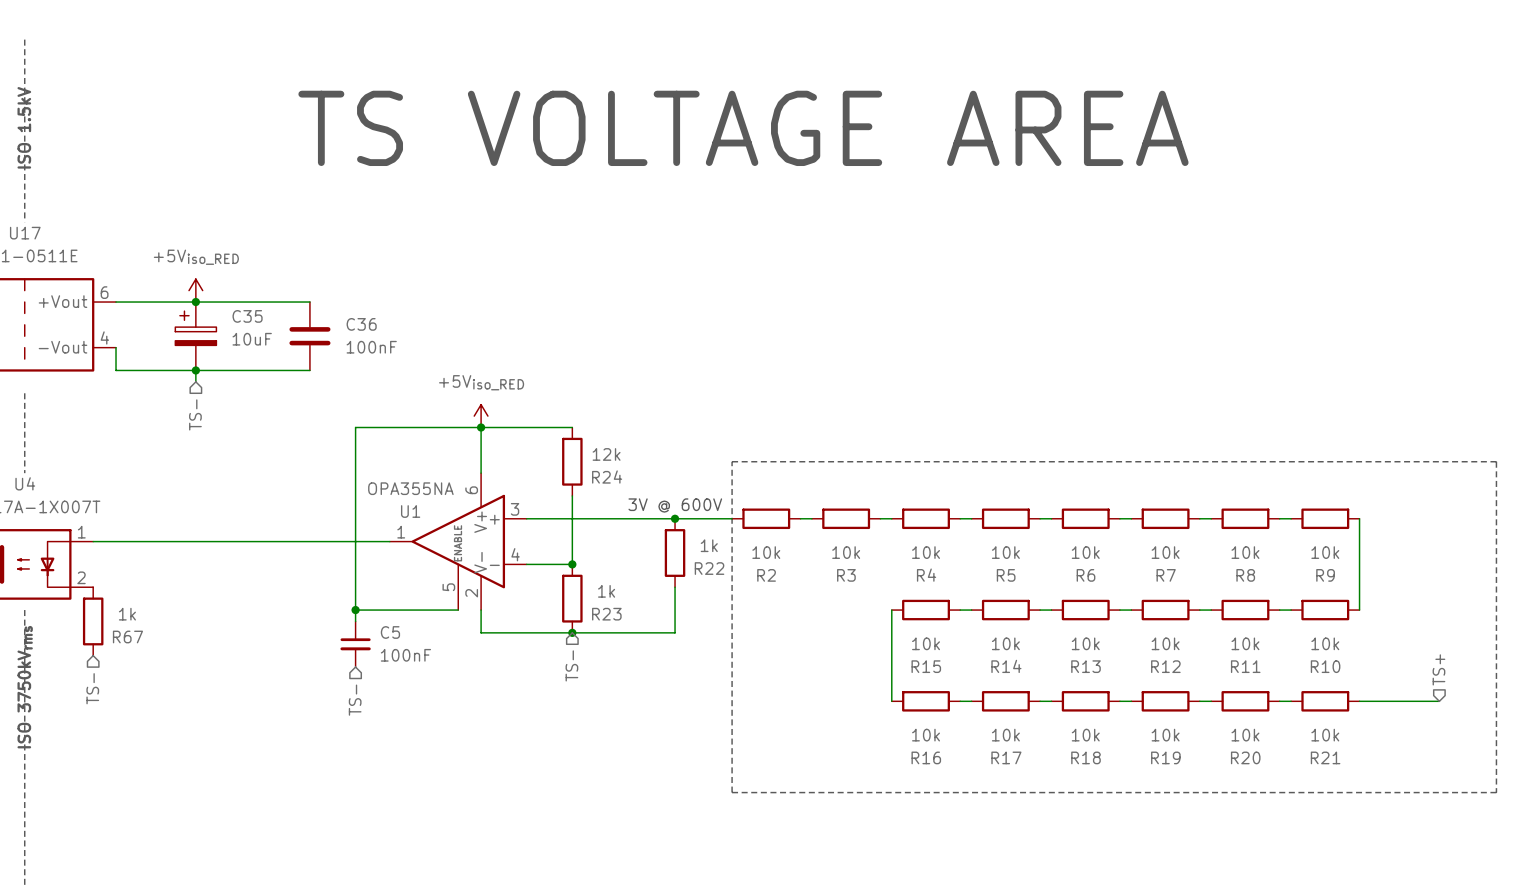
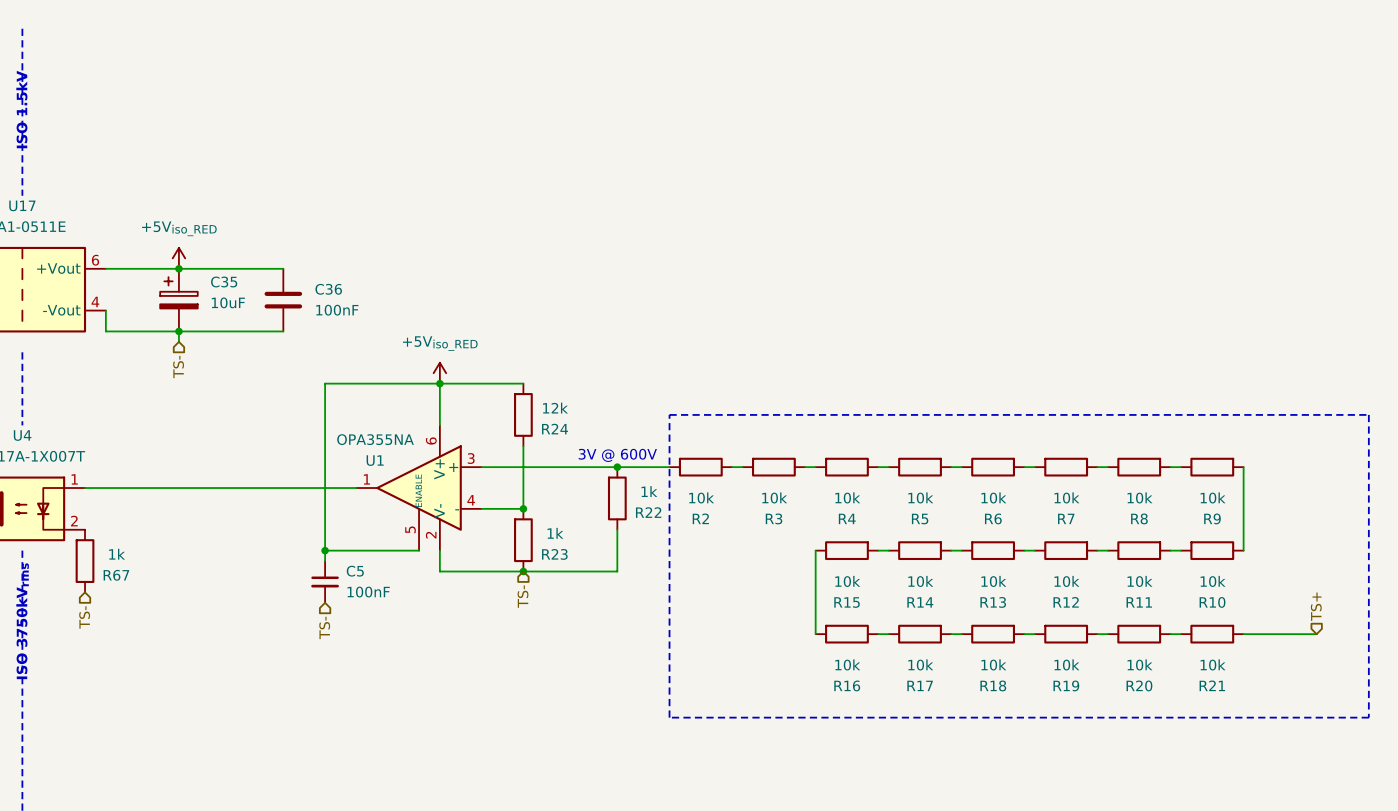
text: TS VOLTAGE AREA (743, 128) -> none

